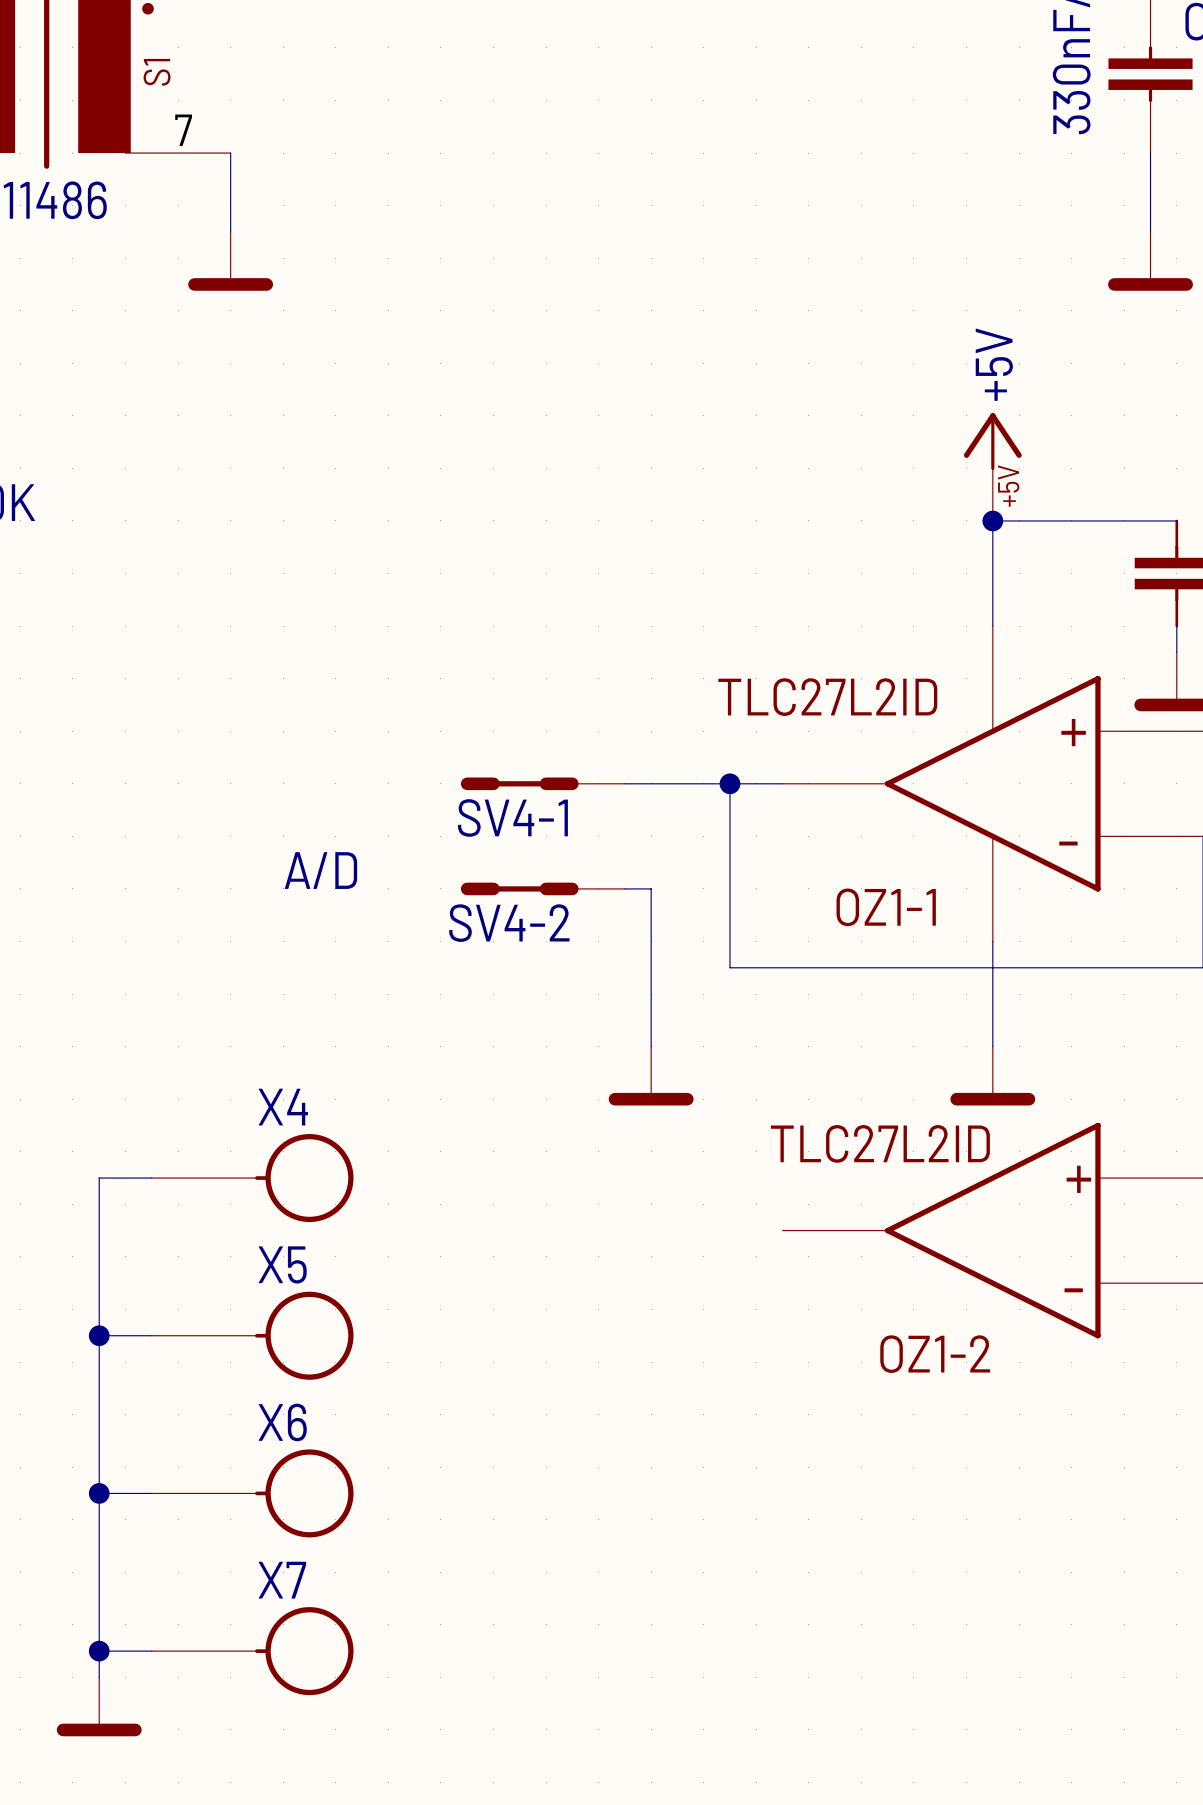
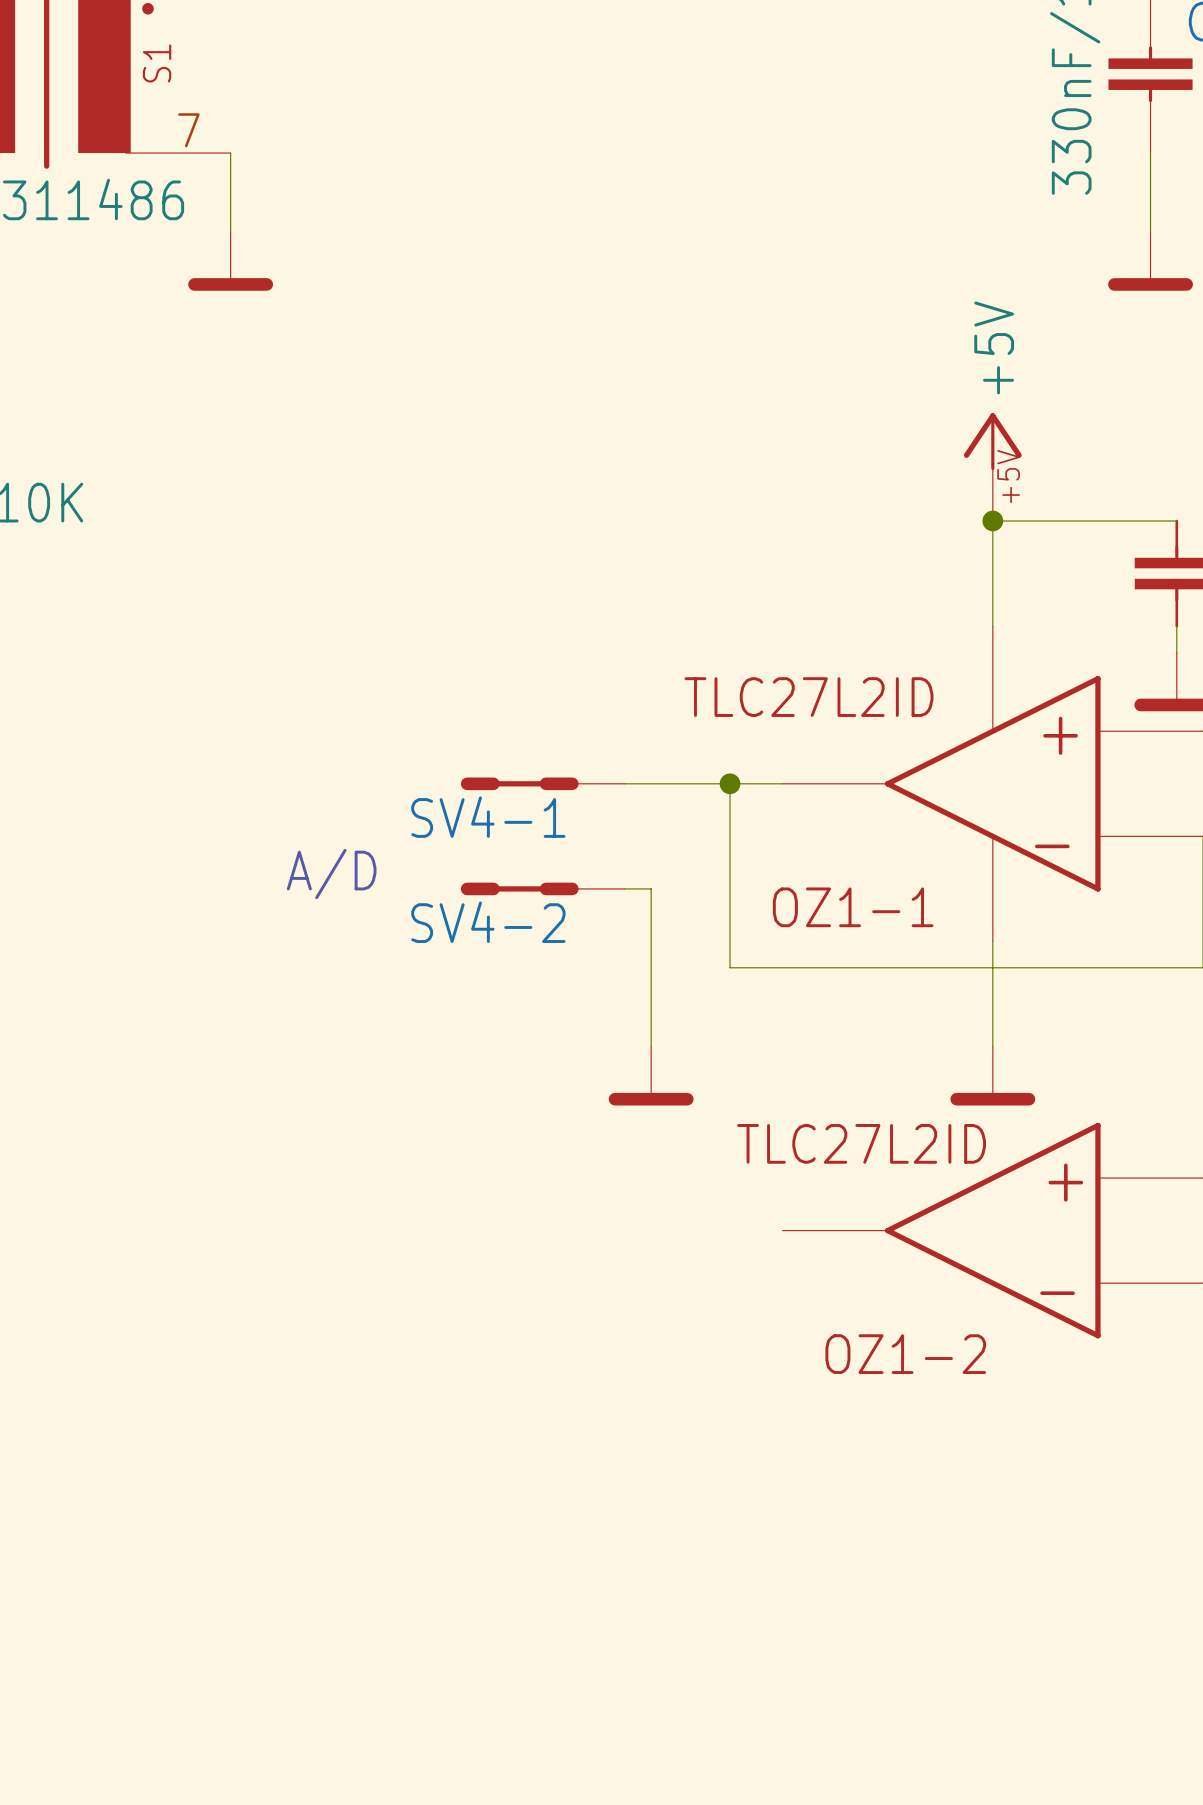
wire: (151, 1178) (99, 1178) (99, 1677) -> none
X4: (252, 1178) -> none
wire: (99, 1335) (151, 1335) -> none
junction: (99, 1335) -> none
X5: (252, 1335) -> none
wire: (99, 1493) (151, 1493) -> none
junction: (99, 1493) -> none
X6: (252, 1493) -> none
wire: (99, 1651) (151, 1651) -> none
junction: (99, 1651) -> none
X7: (252, 1651) -> none
power symbol: (99, 1706) -> none

